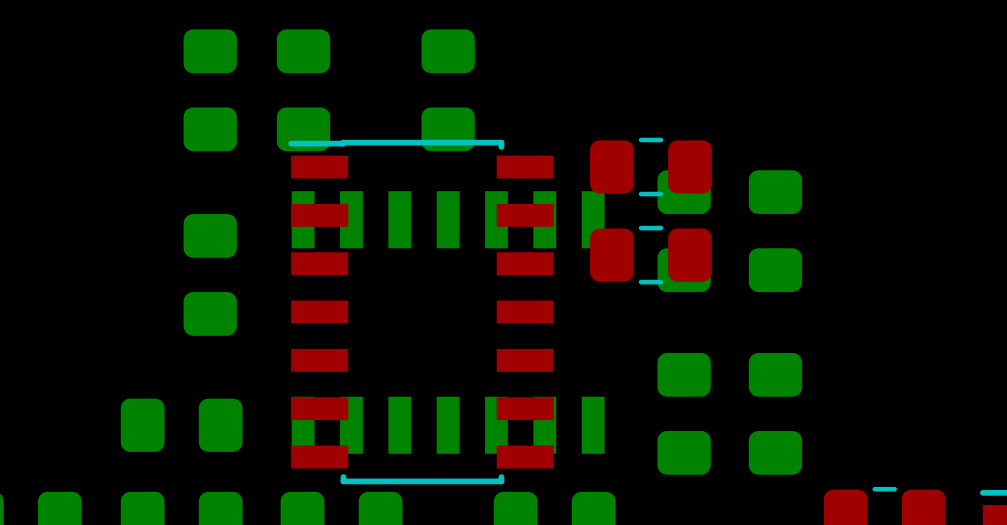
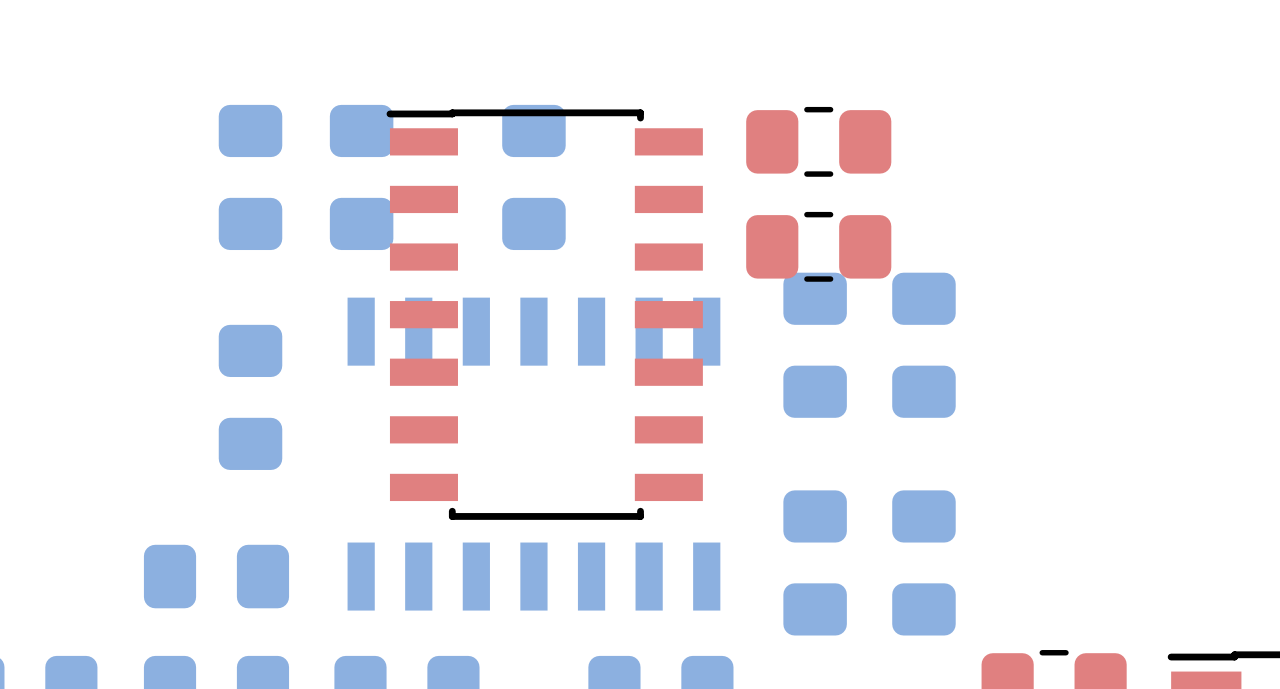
part: none -> (818, 141)
part position: (651, 167) -> (818, 246)
part: (651, 255) -> none
part position: (421, 312) -> (544, 314)

